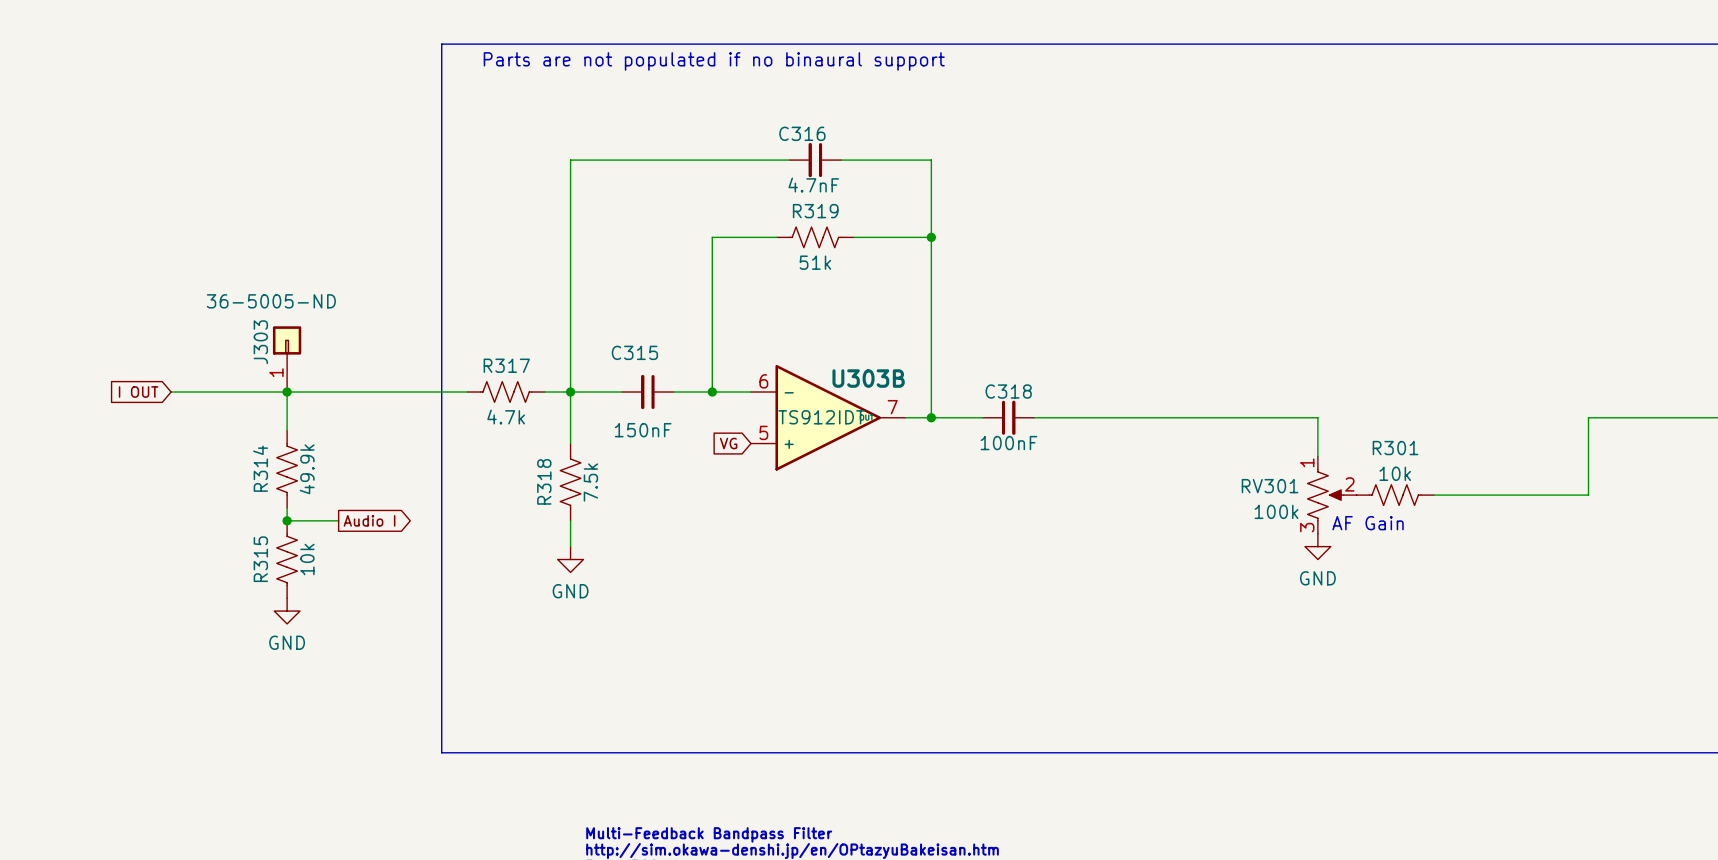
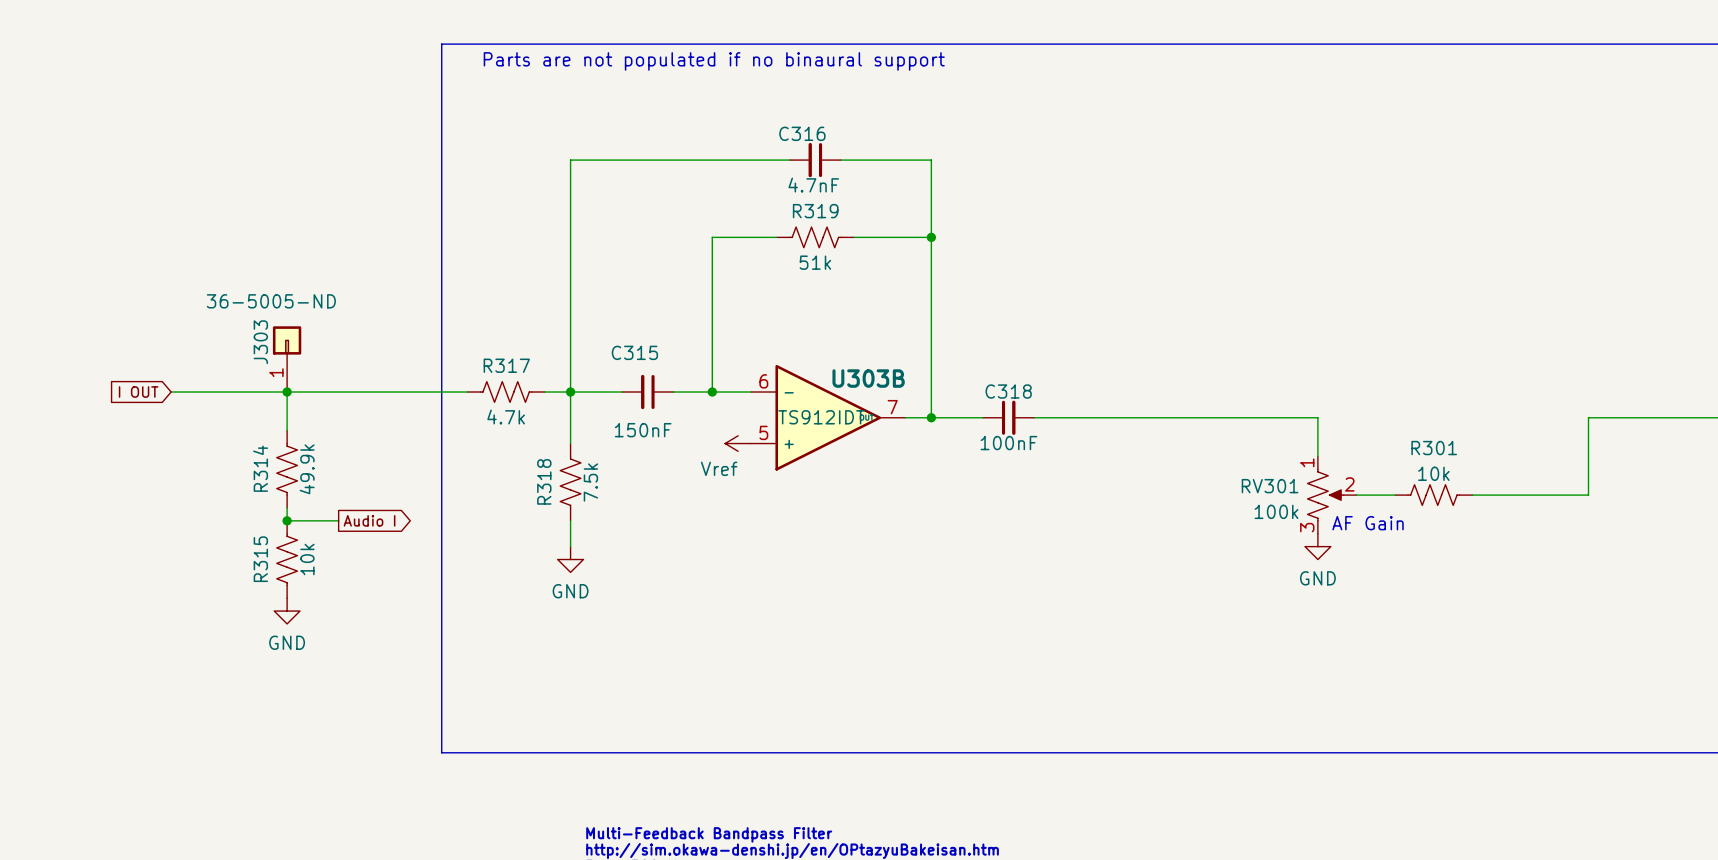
global label: VG (728, 443) -> none
power symbol: none -> Vref (738, 443)
R301 position: (1395, 495) -> (1433, 495)

